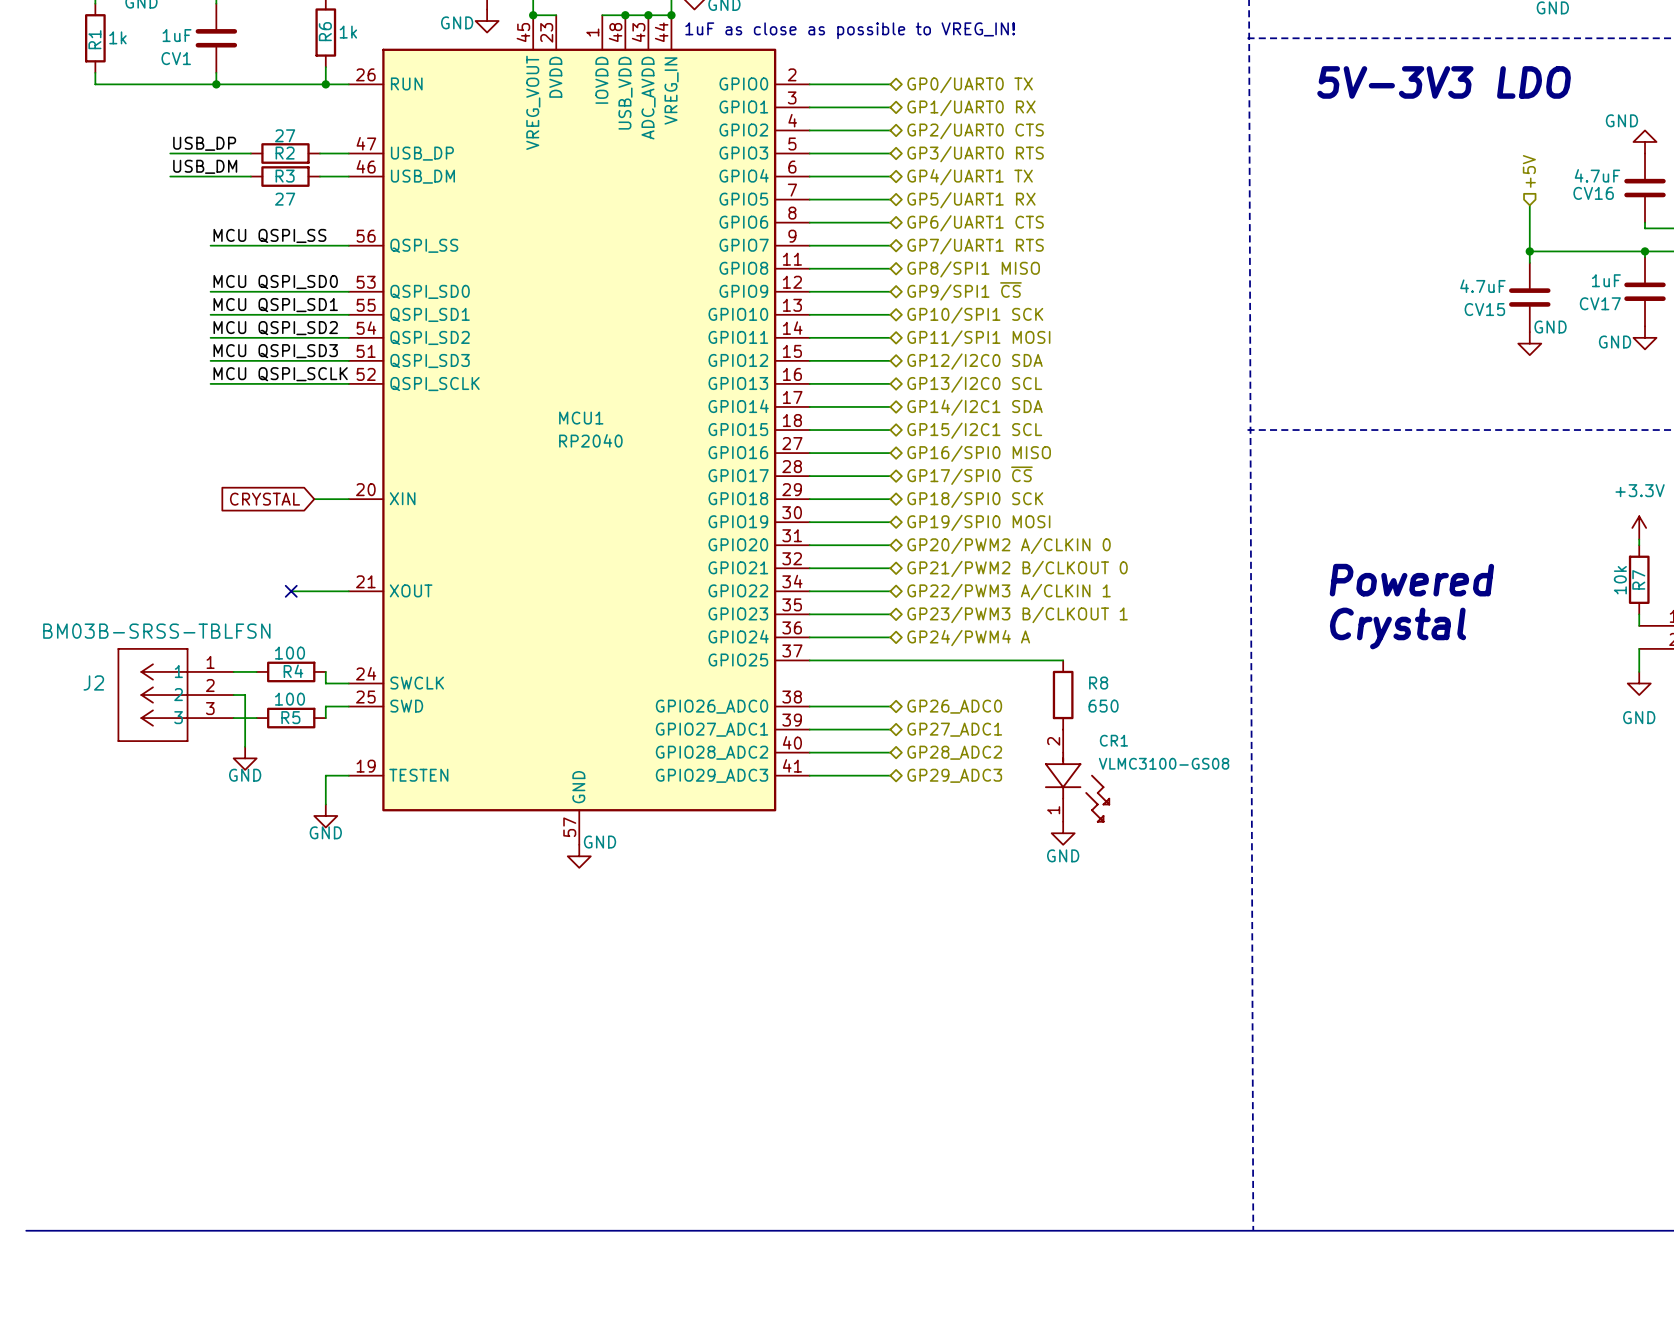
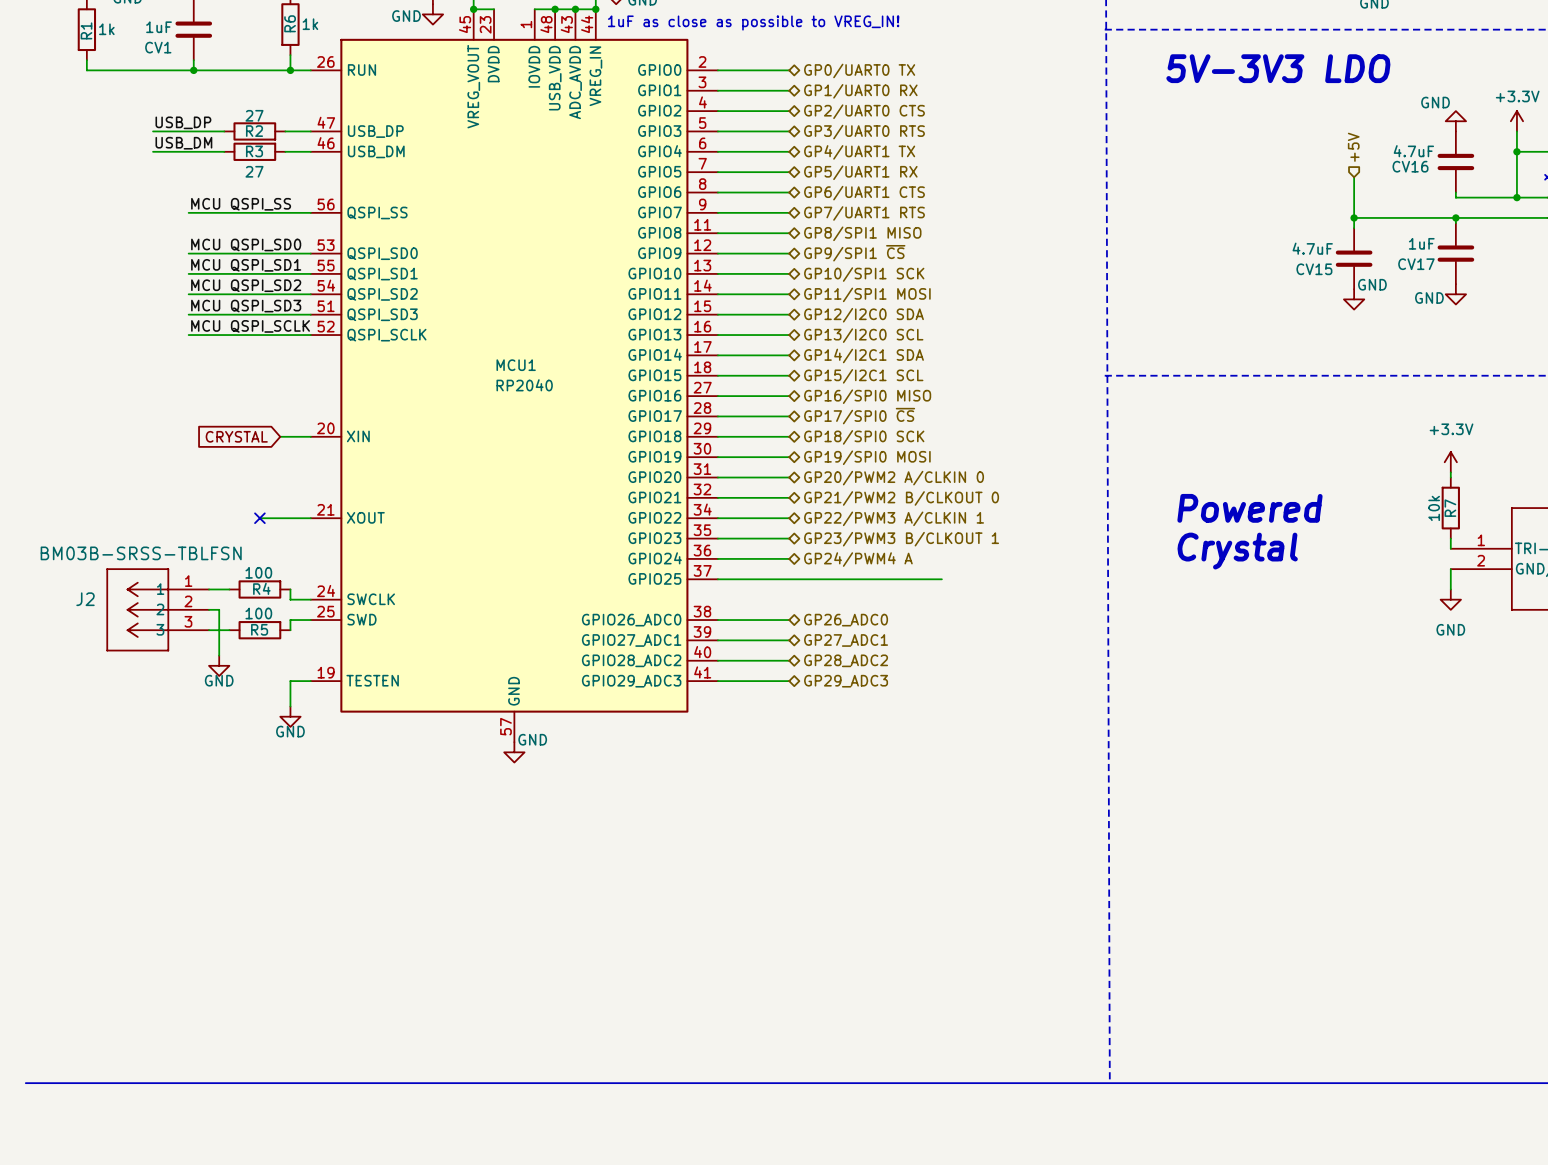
R8: 650 (1063, 695) -> none
CR1: VLMC3100-GS08 (1077, 776) -> none
power symbol: GND (1063, 833) -> none

